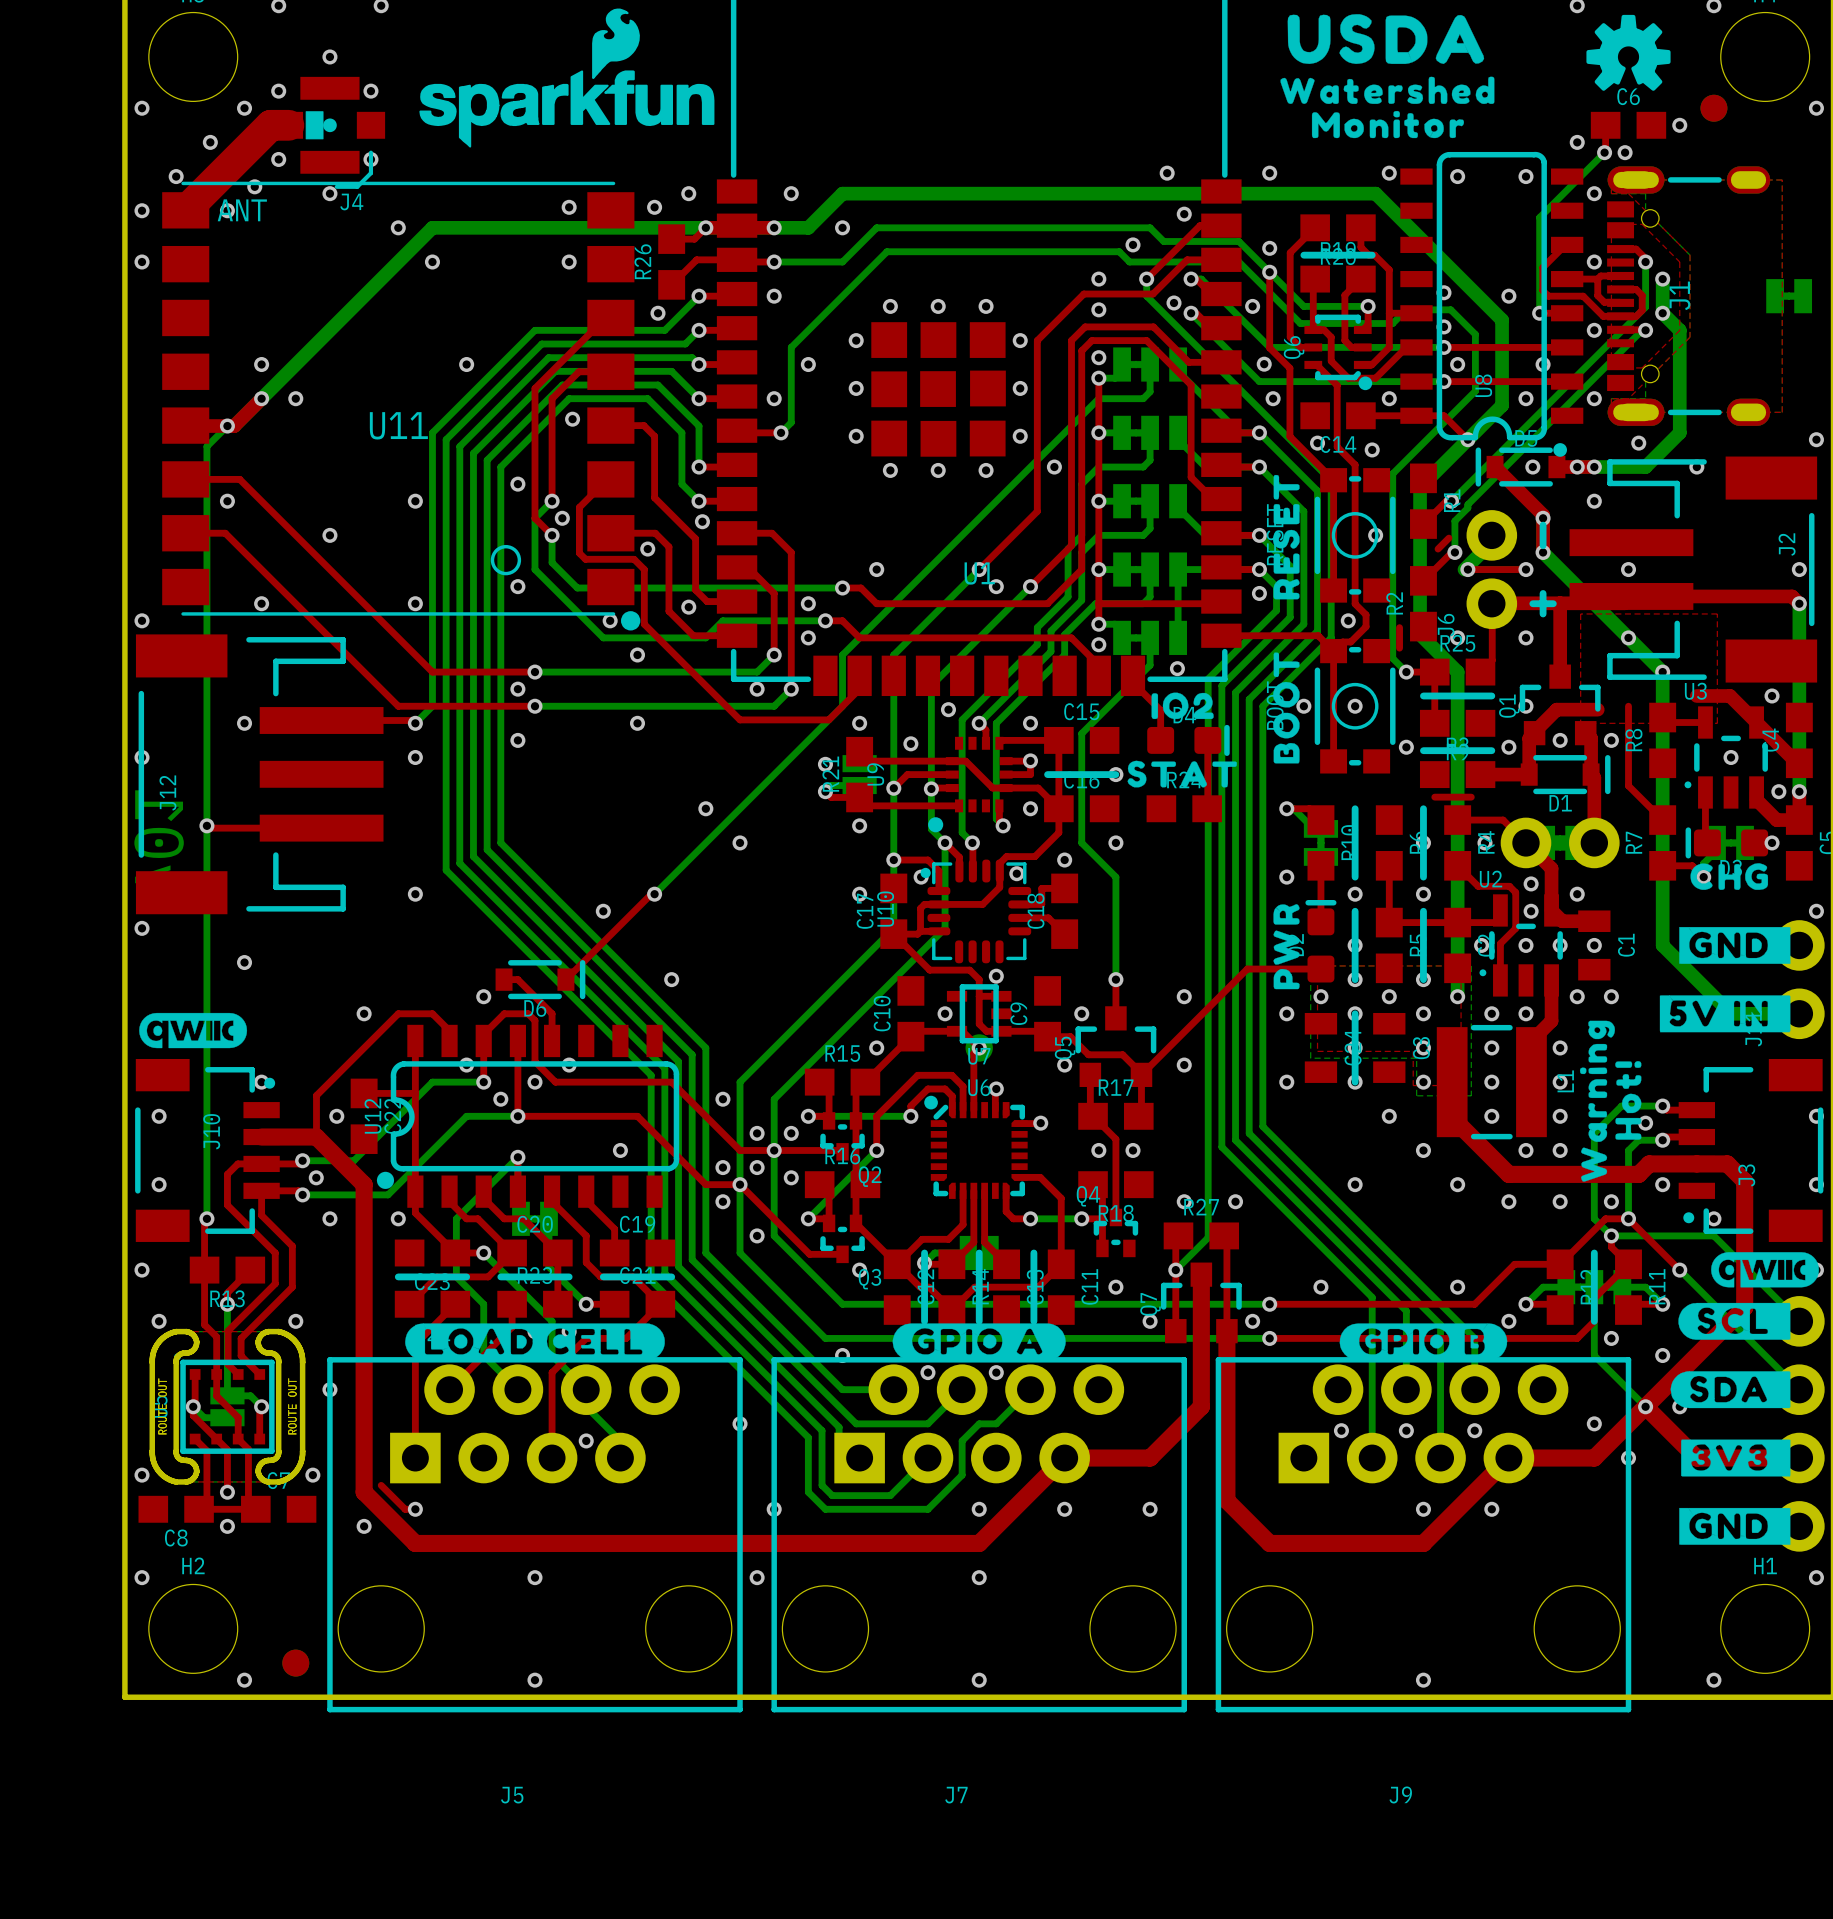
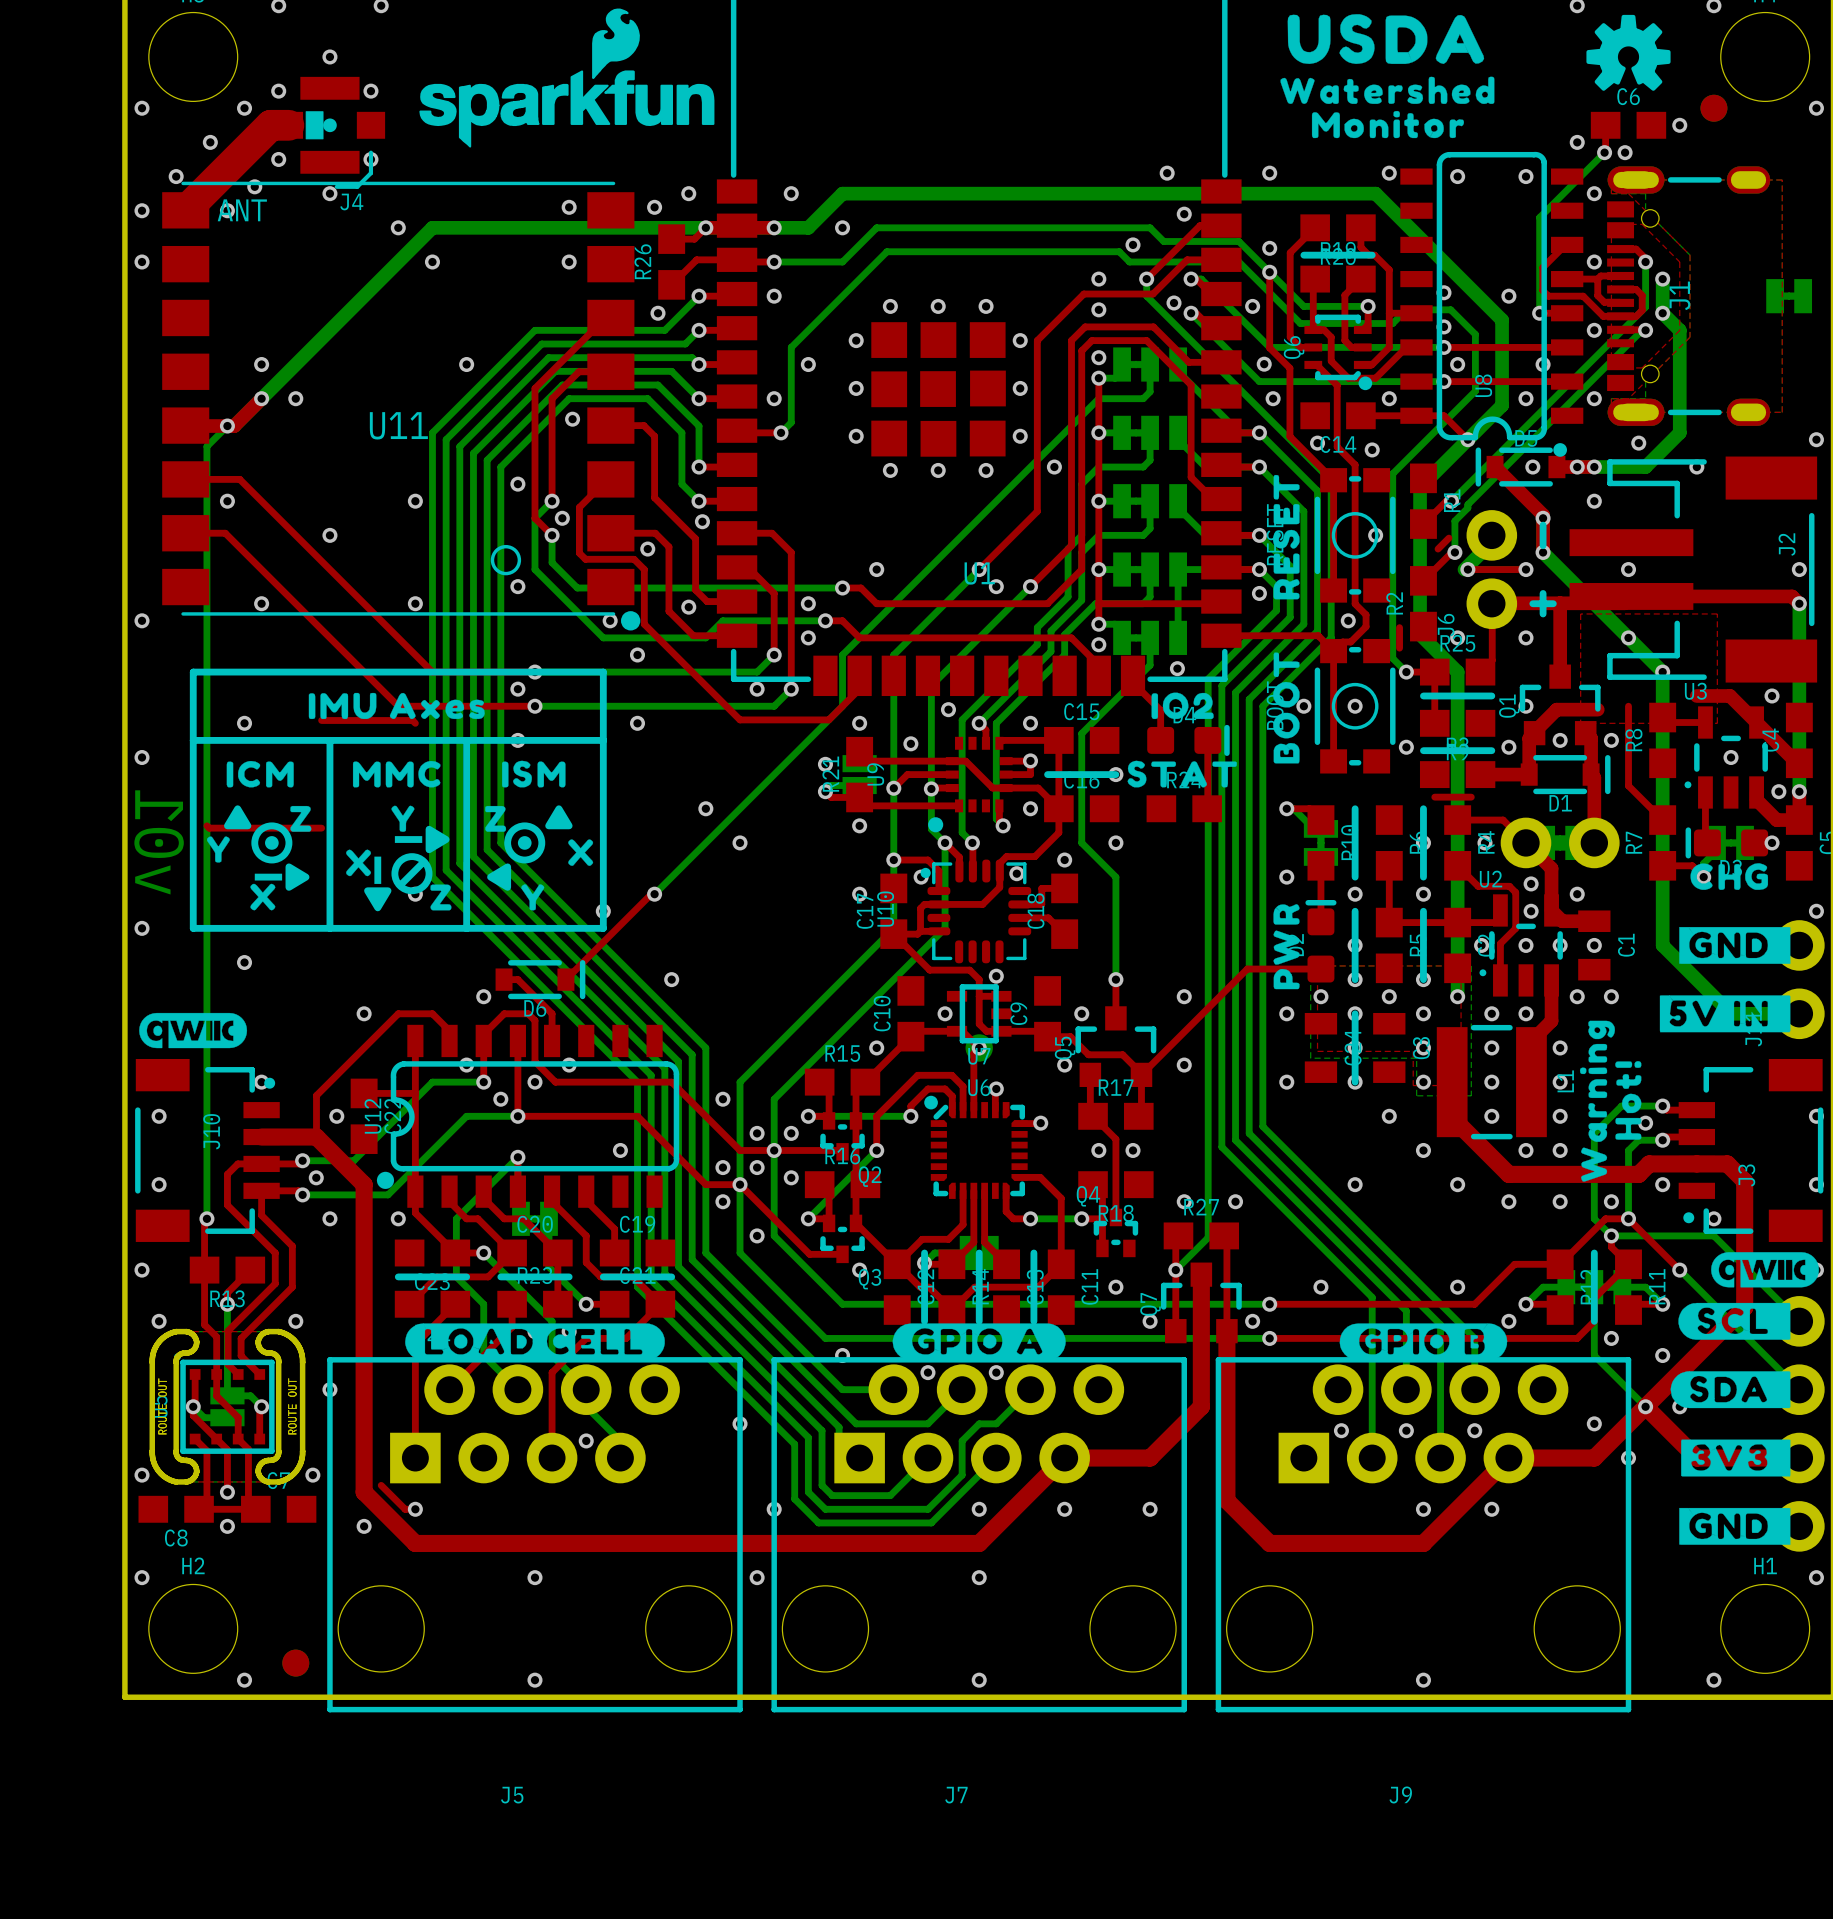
line: none -> (193, 672) (603, 672) (603, 928) (193, 928) (193, 672)
drawing: none -> [308, 692, 485, 720]
bottom track: (432, 706) (415, 723) -> (432, 706) (432, 877) (637, 1082) (637, 1287) (794, 1444) (794, 1499) (818, 1522) (931, 1522) (996, 1458)
via: (415, 723) -> none
line: none -> (193, 740) (603, 740)
line: none -> (329, 740) (329, 928)
line: none -> (466, 740) (466, 928)
via: (415, 757) -> none
drawing: none -> [485, 760, 594, 911]
drawing: none -> [207, 761, 312, 911]
drawing: none -> [346, 761, 452, 912]
J12: (259, 774) -> none
via: (206, 825) -> none
line: none -> (394, 839) (446, 839)
line: none -> (377, 856) (377, 907)
line: none -> (422, 863) (401, 883)
line: none -> (254, 877) (306, 877)

